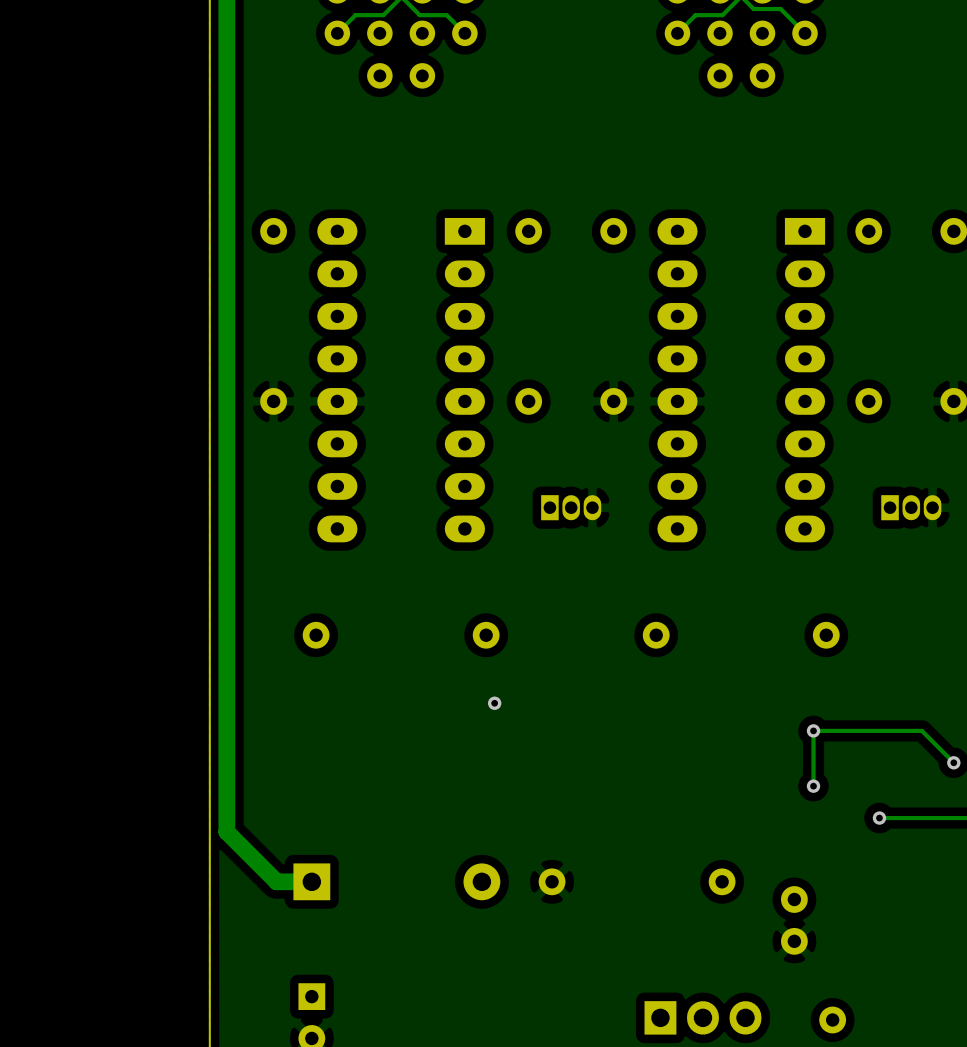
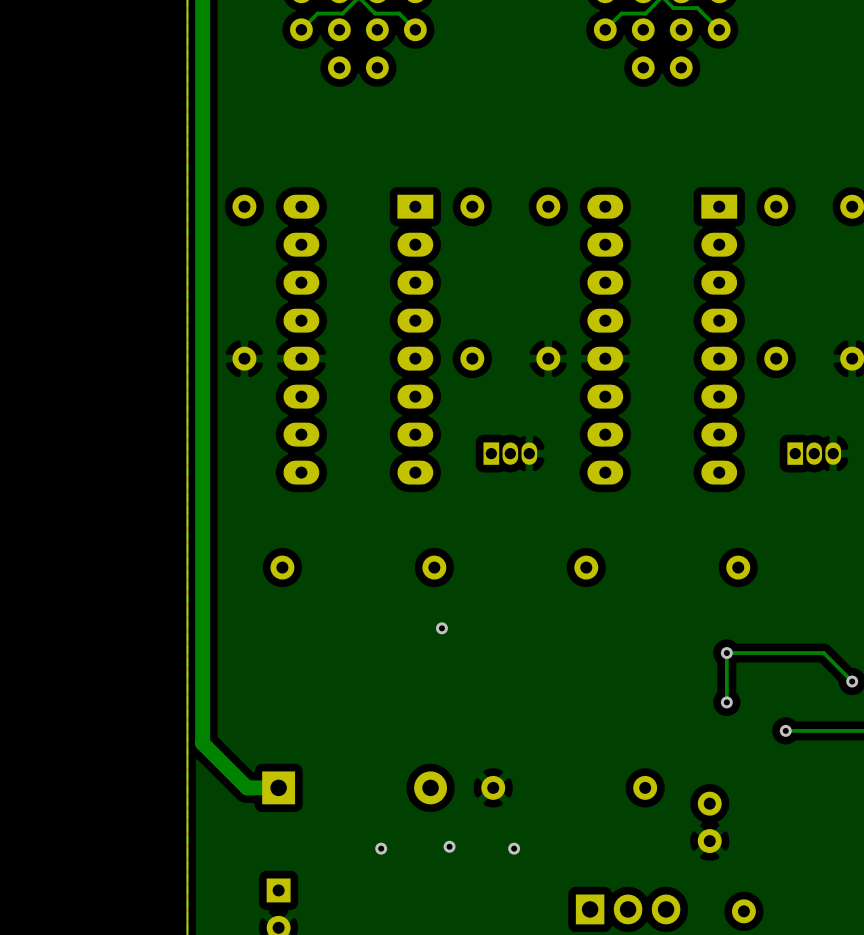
via: none -> (449, 846)
via: none -> (381, 848)
via: none -> (514, 848)

